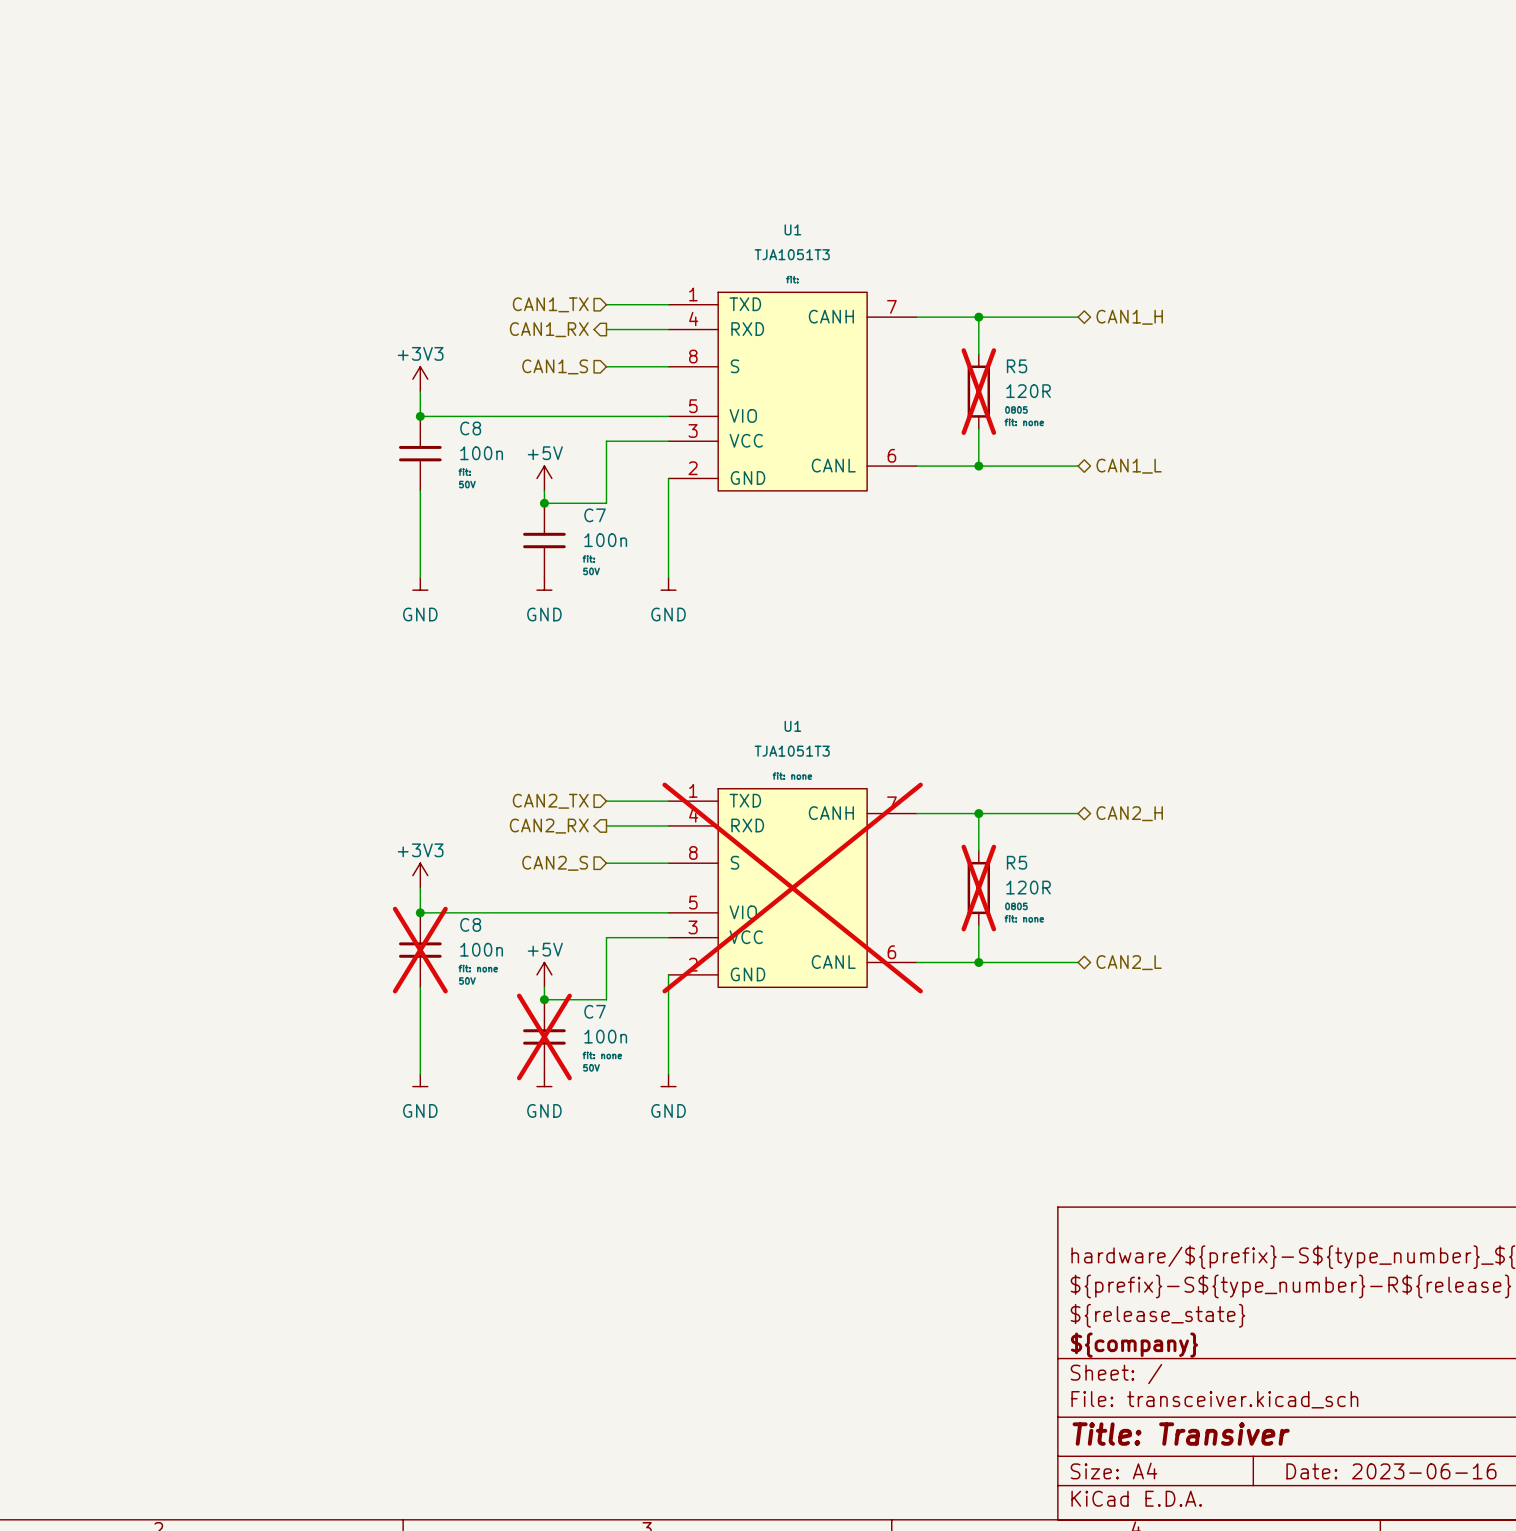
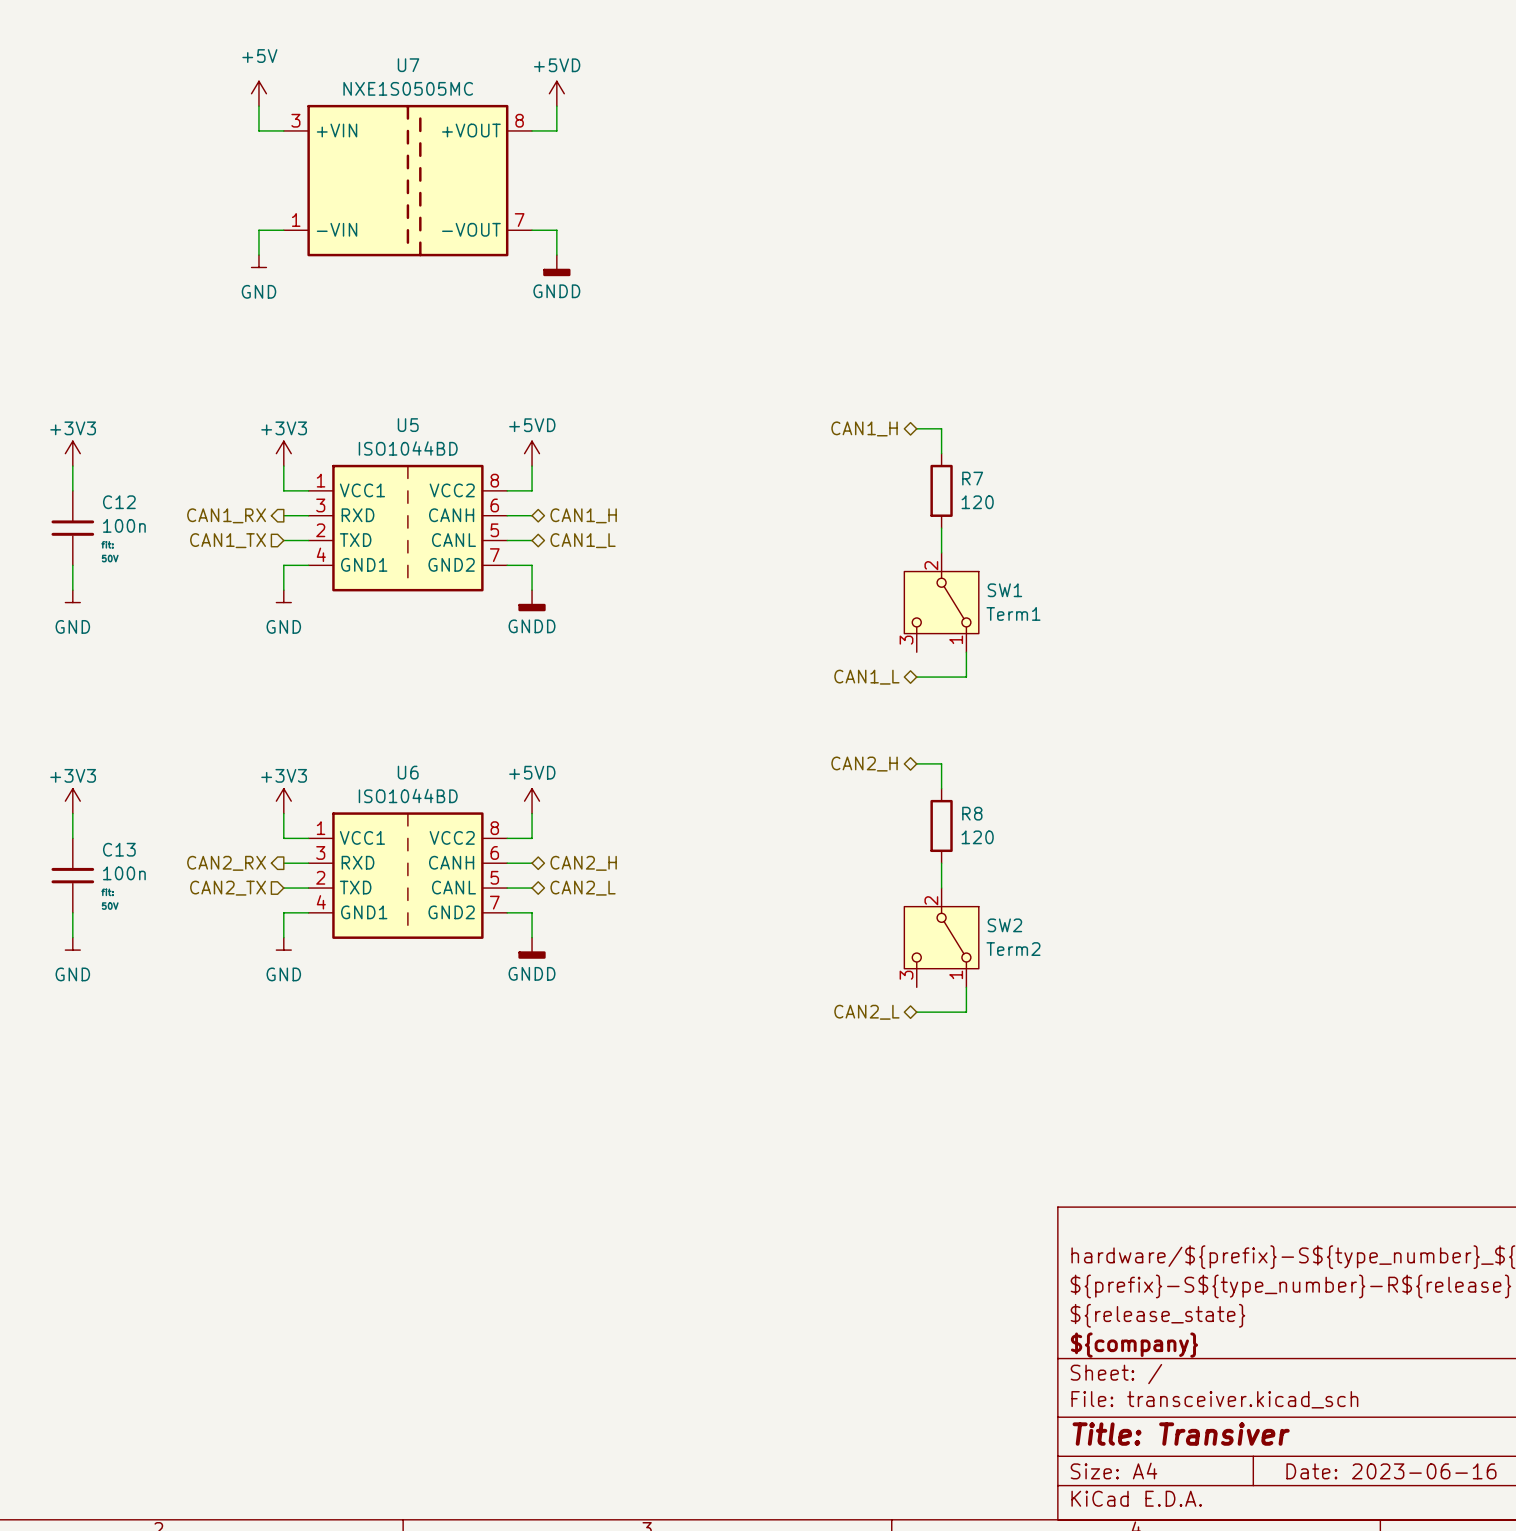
power symbol: none -> +5V (258, 93)
power symbol: none -> +5VD (556, 93)
wire: none -> (258, 106) (258, 130) (283, 130)
wire: none -> (556, 106) (556, 130) (532, 130)
U7: none -> NXE1S0505MC (407, 180)
wire: none -> (283, 230) (258, 230) (258, 255)
wire: none -> (532, 230) (556, 230) (556, 255)
power symbol: none -> GND (258, 261)
power symbol: none -> GNDD (556, 265)
hierarchical label: CAN1_TX (550, 304) -> none
wire: (606, 304) (668, 304) -> none
wire: (916, 317) (1078, 317) -> none
wire: (978, 317) (978, 354) -> none
junction: (978, 317) -> none
hierarchical label rotation: 0° (1129, 317) -> 180° (864, 428)
hierarchical label position: CAN1_H (1129, 317) -> CAN1_H (864, 428)
hierarchical label: CAN1_RX (549, 329) -> none
wire: (606, 329) (668, 329) -> none
hierarchical label: CAN1_S (555, 366) -> none
wire: (606, 366) (668, 366) -> none
power symbol position: +3V3 (420, 379) -> +3V3 (283, 453)
wire: (420, 391) (420, 416) (668, 416) -> none
U1: TJA1051T3 (792, 391) -> none
R5: (978, 391) -> none
junction: (420, 416) -> none
wire: none -> (916, 428) (941, 428) (941, 453)
wire: (978, 428) (978, 466) -> none
wire: (668, 441) (606, 441) (606, 503) (544, 503) (544, 490) -> none
power symbol: none -> +3V3 (72, 453)
C8: (420, 453) -> none
power symbol: none -> +5VD (532, 453)
wire: none -> (72, 466) (72, 490)
wire: none -> (283, 466) (283, 490) (308, 490)
wire: none -> (532, 466) (532, 490) (507, 490)
wire: (916, 466) (1078, 466) -> none
junction: (978, 466) -> none
hierarchical label: CAN1_L (1129, 466) -> none
power symbol: +5V (544, 478) -> none
wire: (668, 478) (668, 577) -> none
R7: none -> 120 (941, 490)
junction: (544, 503) -> none
hierarchical label: none -> CAN1_RX (226, 515)
wire: none -> (283, 515) (308, 515)
wire: none -> (507, 515) (532, 515)
hierarchical label: none -> CAN1_H (583, 515)
C12: none -> (72, 528)
U5: none -> ISO1044BD (407, 528)
wire: none -> (941, 528) (941, 552)
hierarchical label: none -> CAN1_TX (228, 540)
wire: none -> (283, 540) (308, 540)
wire: none -> (507, 540) (532, 540)
C7: (544, 540) -> none
hierarchical label: none -> CAN1_L (583, 540)
wire: none -> (72, 565) (72, 590)
wire: none -> (308, 565) (283, 565) (283, 590)
wire: none -> (507, 565) (532, 565) (532, 590)
power symbol: GND (420, 583) -> none
power symbol: GND (544, 583) -> none
power symbol: GND (668, 583) -> none
power symbol: none -> GND (72, 596)
power symbol: none -> GND (283, 596)
power symbol: none -> GNDD (532, 600)
SW1: none -> Term1 (941, 602)
wire: none -> (966, 652) (966, 677) (916, 677)
hierarchical label: none -> CAN1_L (866, 677)
wire: none -> (916, 763) (941, 763) (941, 788)
power symbol: none -> +3V3 (72, 801)
power symbol: none -> +5VD (532, 801)
hierarchical label: CAN2_TX (550, 801) -> none
wire: (606, 801) (668, 801) -> none
wire: none -> (72, 813) (72, 838)
wire: none -> (283, 813) (283, 838) (308, 838)
wire: none -> (532, 813) (532, 838) (507, 838)
wire: (916, 813) (1078, 813) -> none
wire: (978, 813) (978, 850) -> none
junction: (978, 813) -> none
hierarchical label rotation: 0° (1129, 813) -> 180° (864, 764)
hierarchical label position: CAN2_H (1129, 813) -> CAN2_H (864, 764)
wire: (606, 825) (668, 825) -> none
R8: none -> 120 (941, 825)
hierarchical label: CAN2_RX (549, 826) -> none
hierarchical label: none -> CAN2_RX (226, 863)
wire: none -> (283, 863) (308, 863)
wire: none -> (507, 863) (532, 863)
hierarchical label: CAN2_S (555, 863) -> none
hierarchical label: none -> CAN2_H (583, 863)
wire: (606, 863) (668, 863) -> none
wire: none -> (941, 863) (941, 888)
C13: none -> (72, 875)
U6: none -> ISO1044BD (407, 875)
power symbol position: +3V3 (420, 875) -> +3V3 (283, 801)
hierarchical label: none -> CAN2_TX (228, 888)
wire: none -> (283, 888) (308, 888)
wire: none -> (507, 888) (532, 888)
hierarchical label: none -> CAN2_L (583, 888)
U1: TJA1051T3 (792, 888) -> none
R5: (978, 888) -> none
wire: none -> (72, 912) (72, 937)
wire: none -> (308, 912) (283, 912) (283, 937)
junction: (420, 912) -> none
wire: (532, 912) (668, 912) -> (532, 912) (532, 937)
wire: (668, 937) (606, 937) (606, 999) (544, 999) (544, 987) -> none
SW2: none -> Term2 (941, 937)
power symbol: none -> GND (72, 943)
power symbol: none -> GND (283, 943)
power symbol: none -> GNDD (532, 948)
C8: (420, 950) -> none
wire: (916, 962) (1078, 962) -> none
junction: (978, 962) -> none
hierarchical label rotation: 0° (1129, 962) -> 180° (866, 1012)
hierarchical label position: CAN2_L (1129, 962) -> CAN2_L (866, 1012)
power symbol: +5V (544, 974) -> none
wire: (668, 974) (668, 1074) -> none
wire: (420, 987) (420, 1074) -> none
wire: none -> (966, 987) (966, 1012) (916, 1012)
junction: (544, 999) -> none
C7: (544, 1036) -> none
power symbol: GND (420, 1080) -> none
power symbol: GND (544, 1080) -> none
power symbol: GND (668, 1080) -> none

